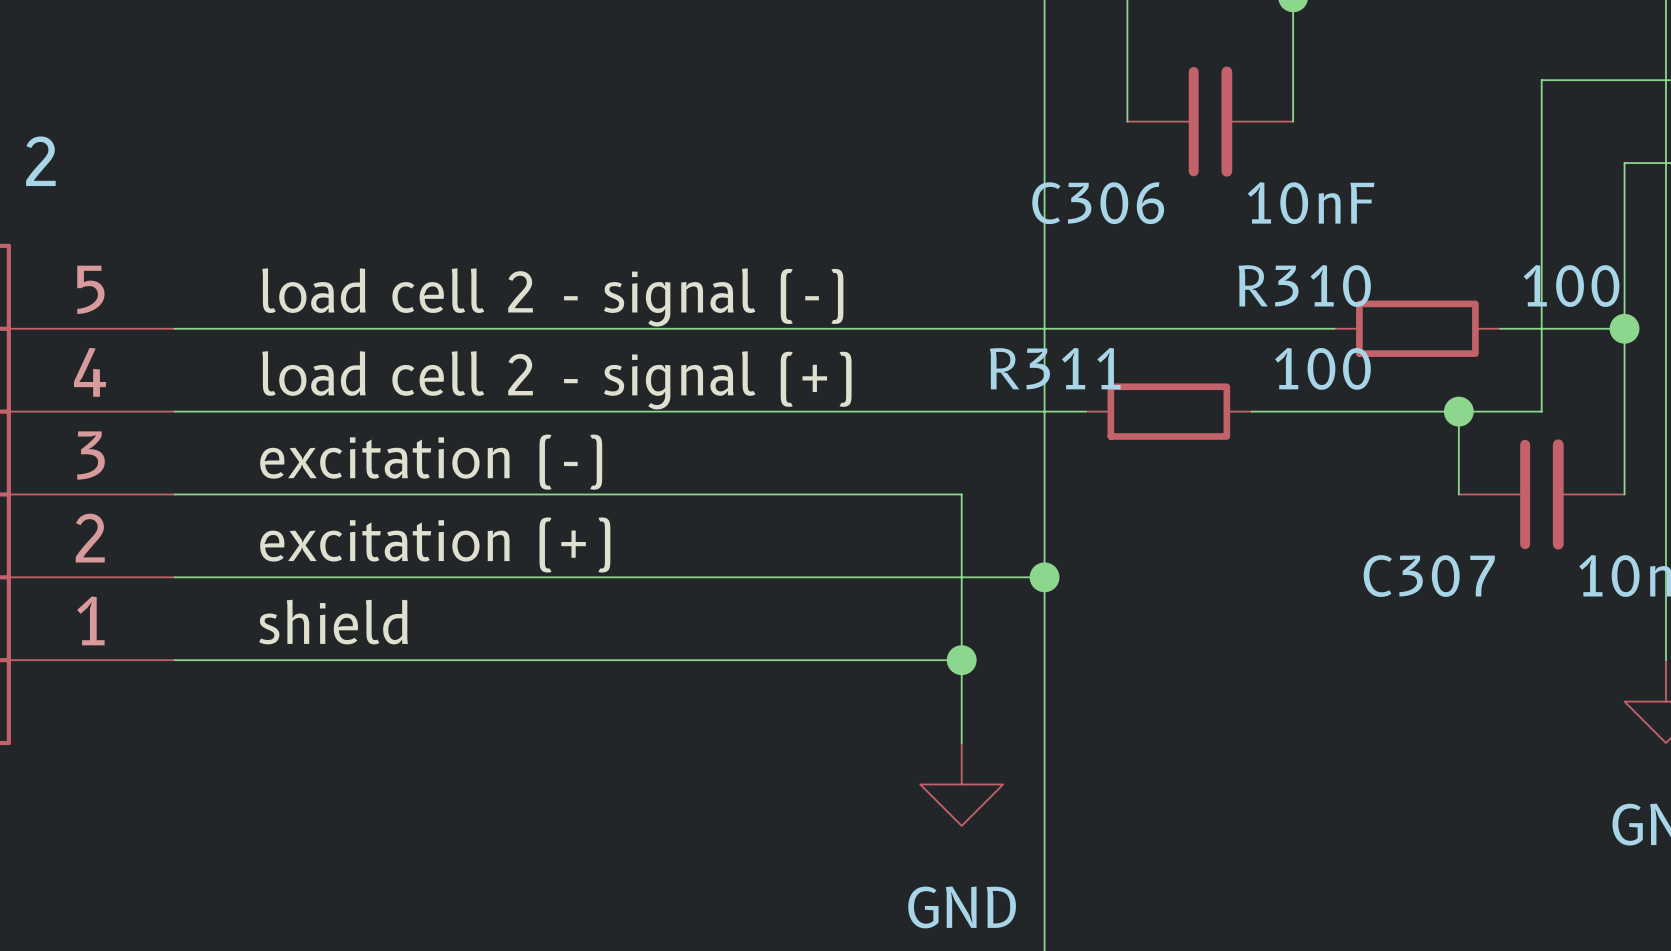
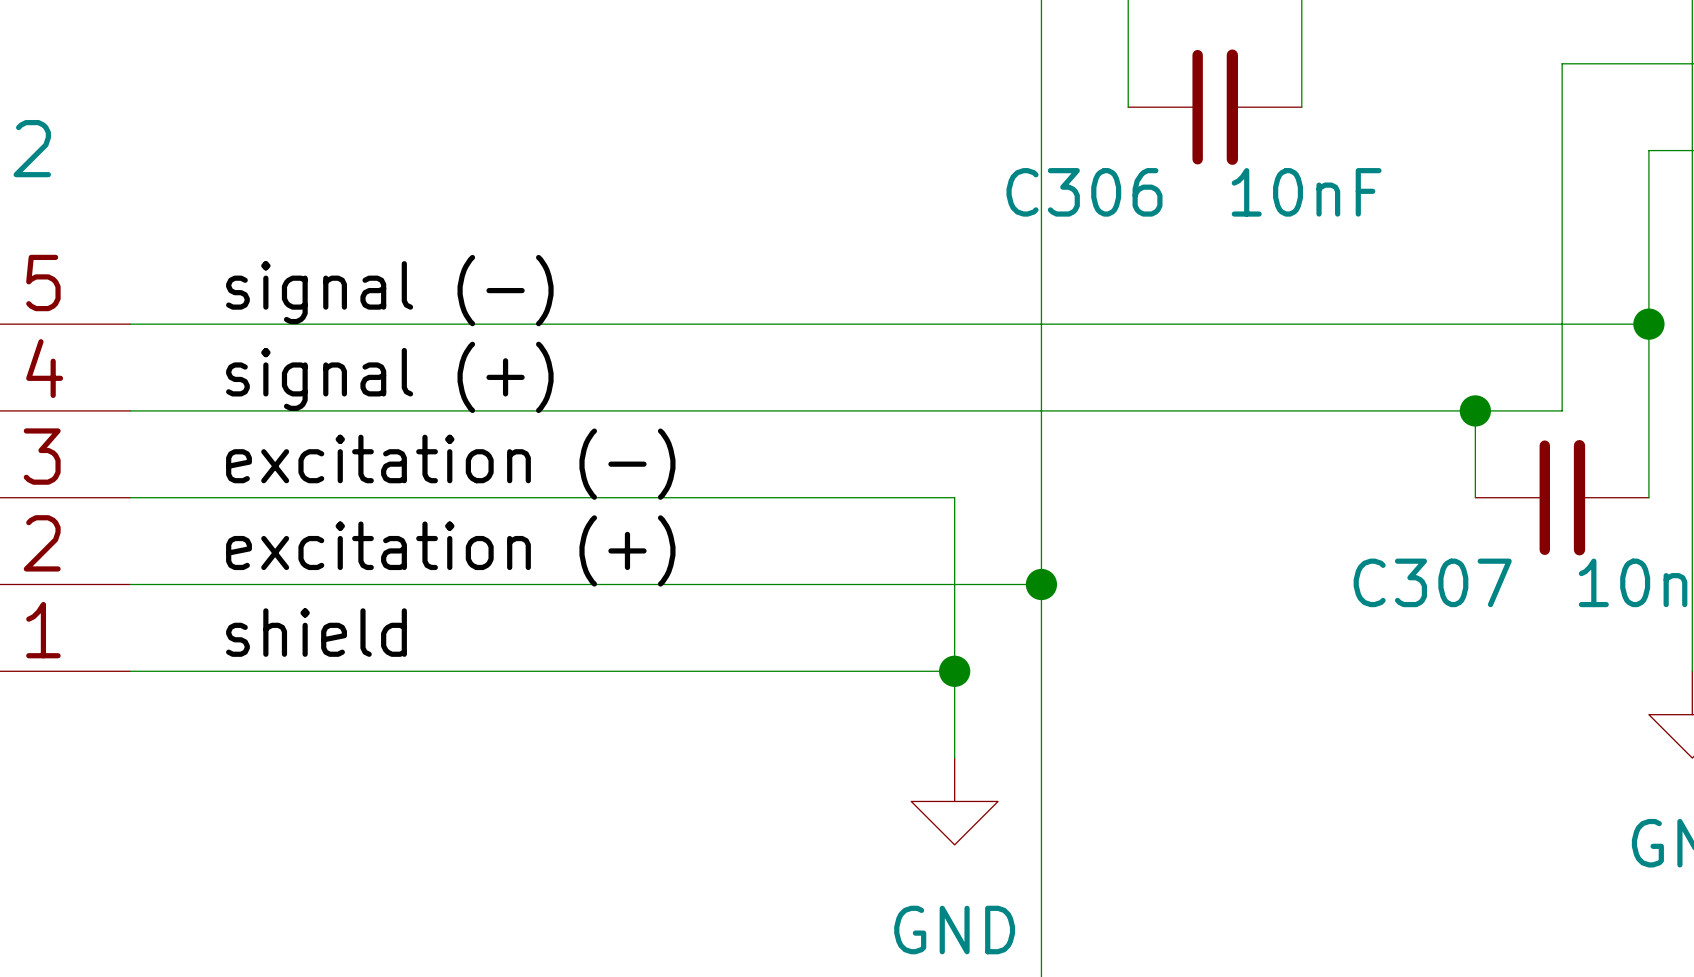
label: load cell 2 - signal (-) (552, 297) -> signal (-) (389, 290)
wire: none -> (1345, 324) (1518, 324)
R310: 100 (1417, 328) -> none
label: load cell 2 - signal (+) (556, 380) -> signal (+) (389, 377)
wire: none -> (1084, 410) (1258, 410)
R311: 100 (1168, 411) -> none

